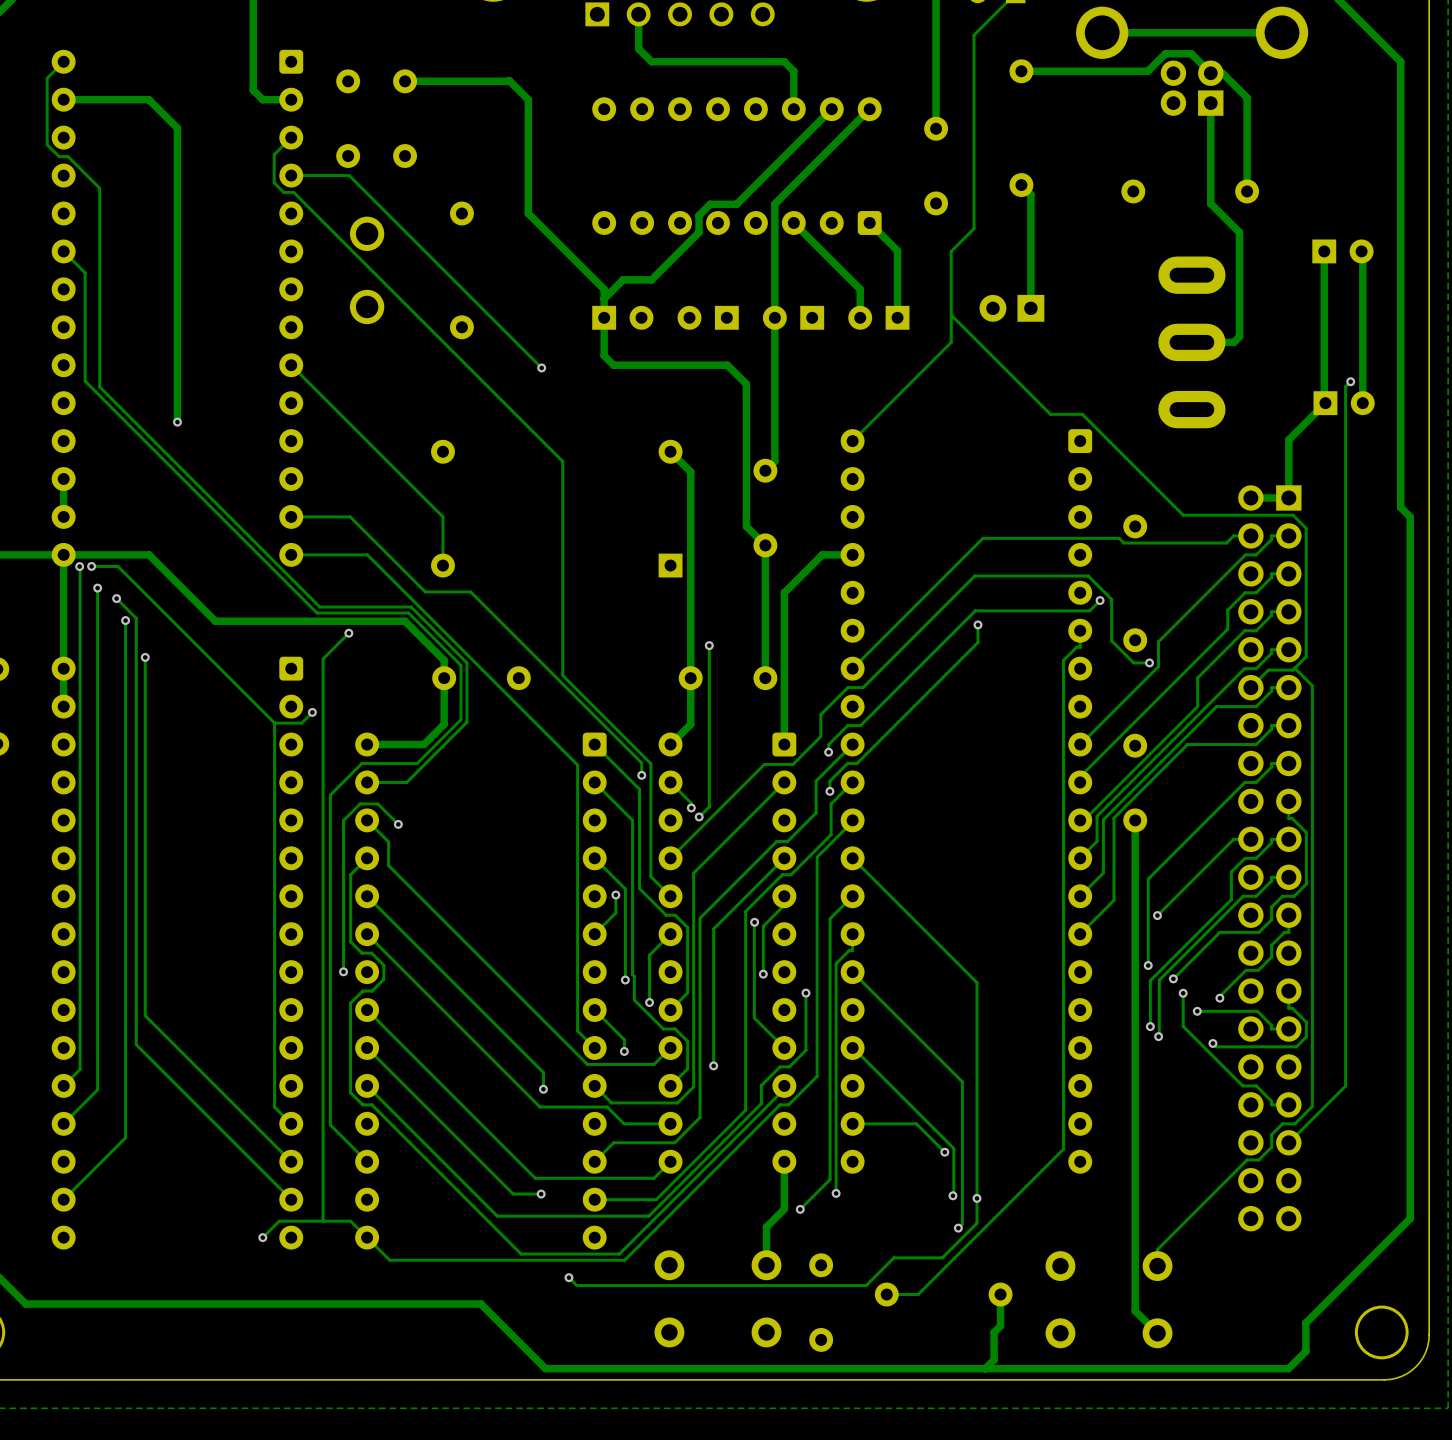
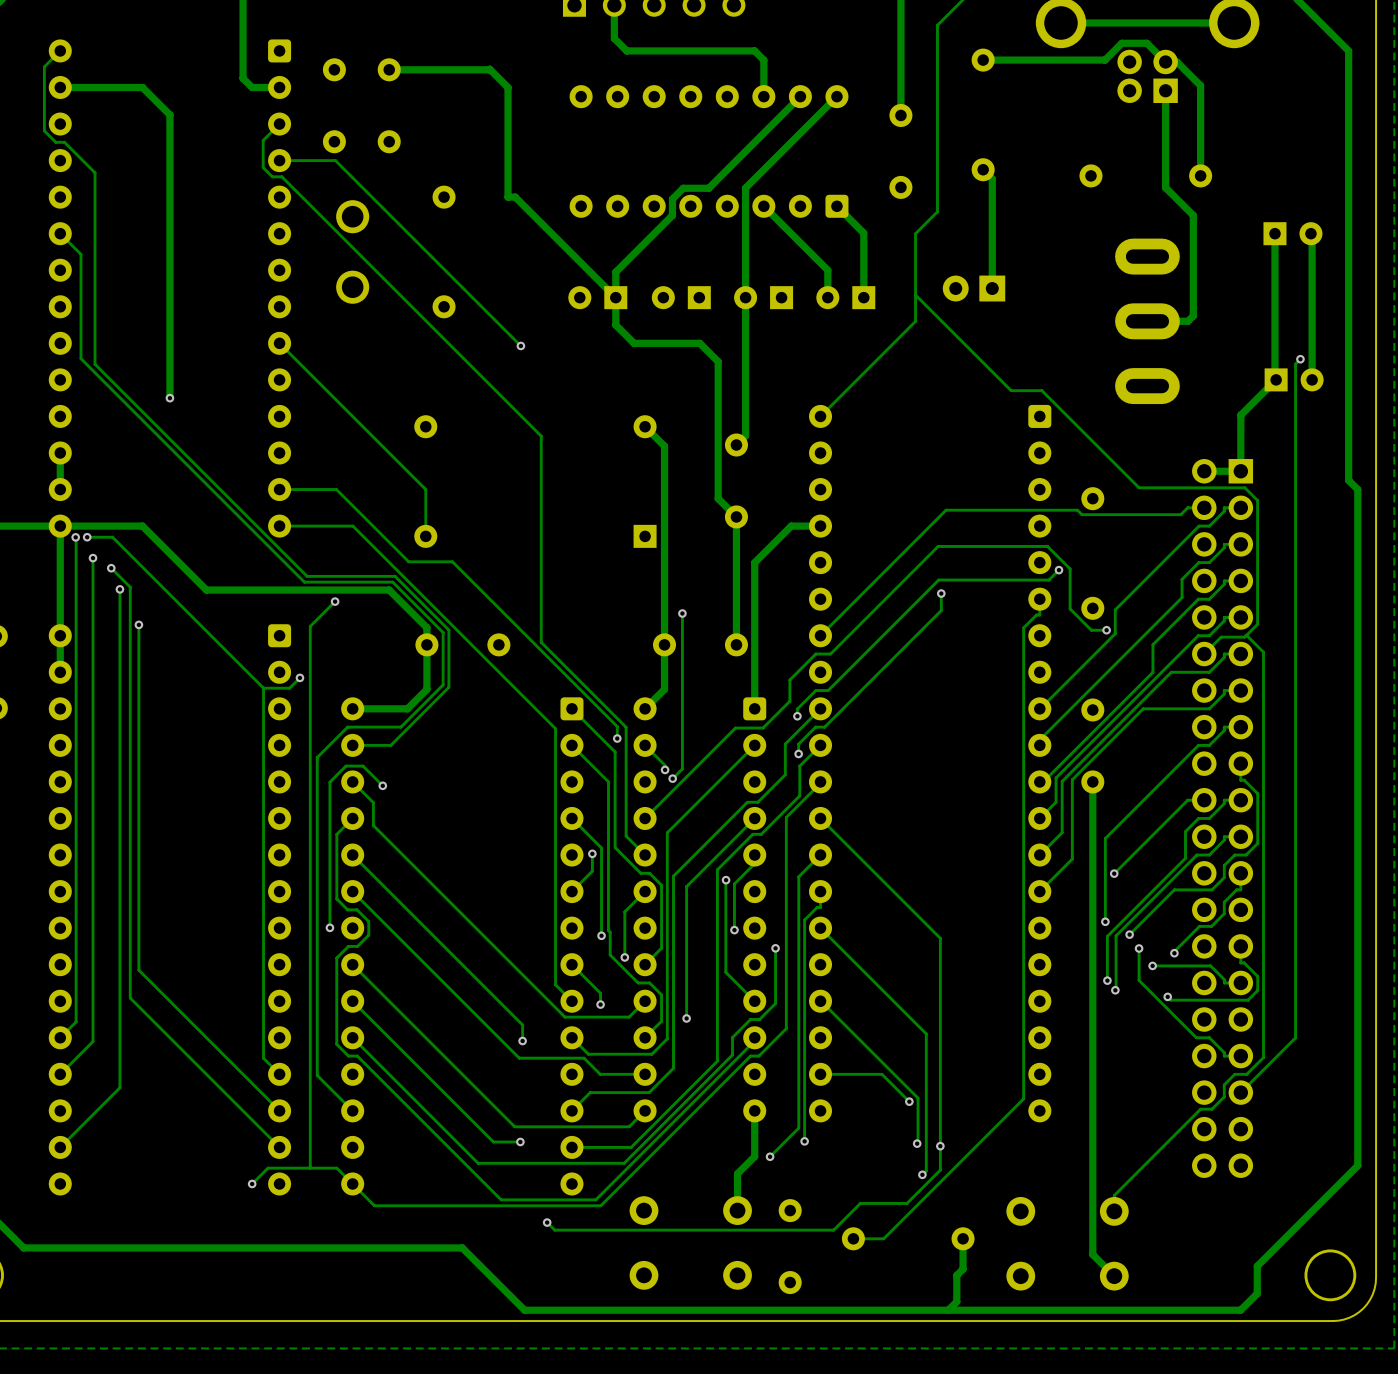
track: (528, 213) (604, 289) (604, 355) (613, 365) (659, 365) -> (508, 197) (515, 197) (615, 297)
track: (651, 279) (623, 279) (604, 298) -> (626, 261) (615, 272) (615, 325) (634, 343)
part rotation: 0° (622, 317) -> 180° (597, 297)

